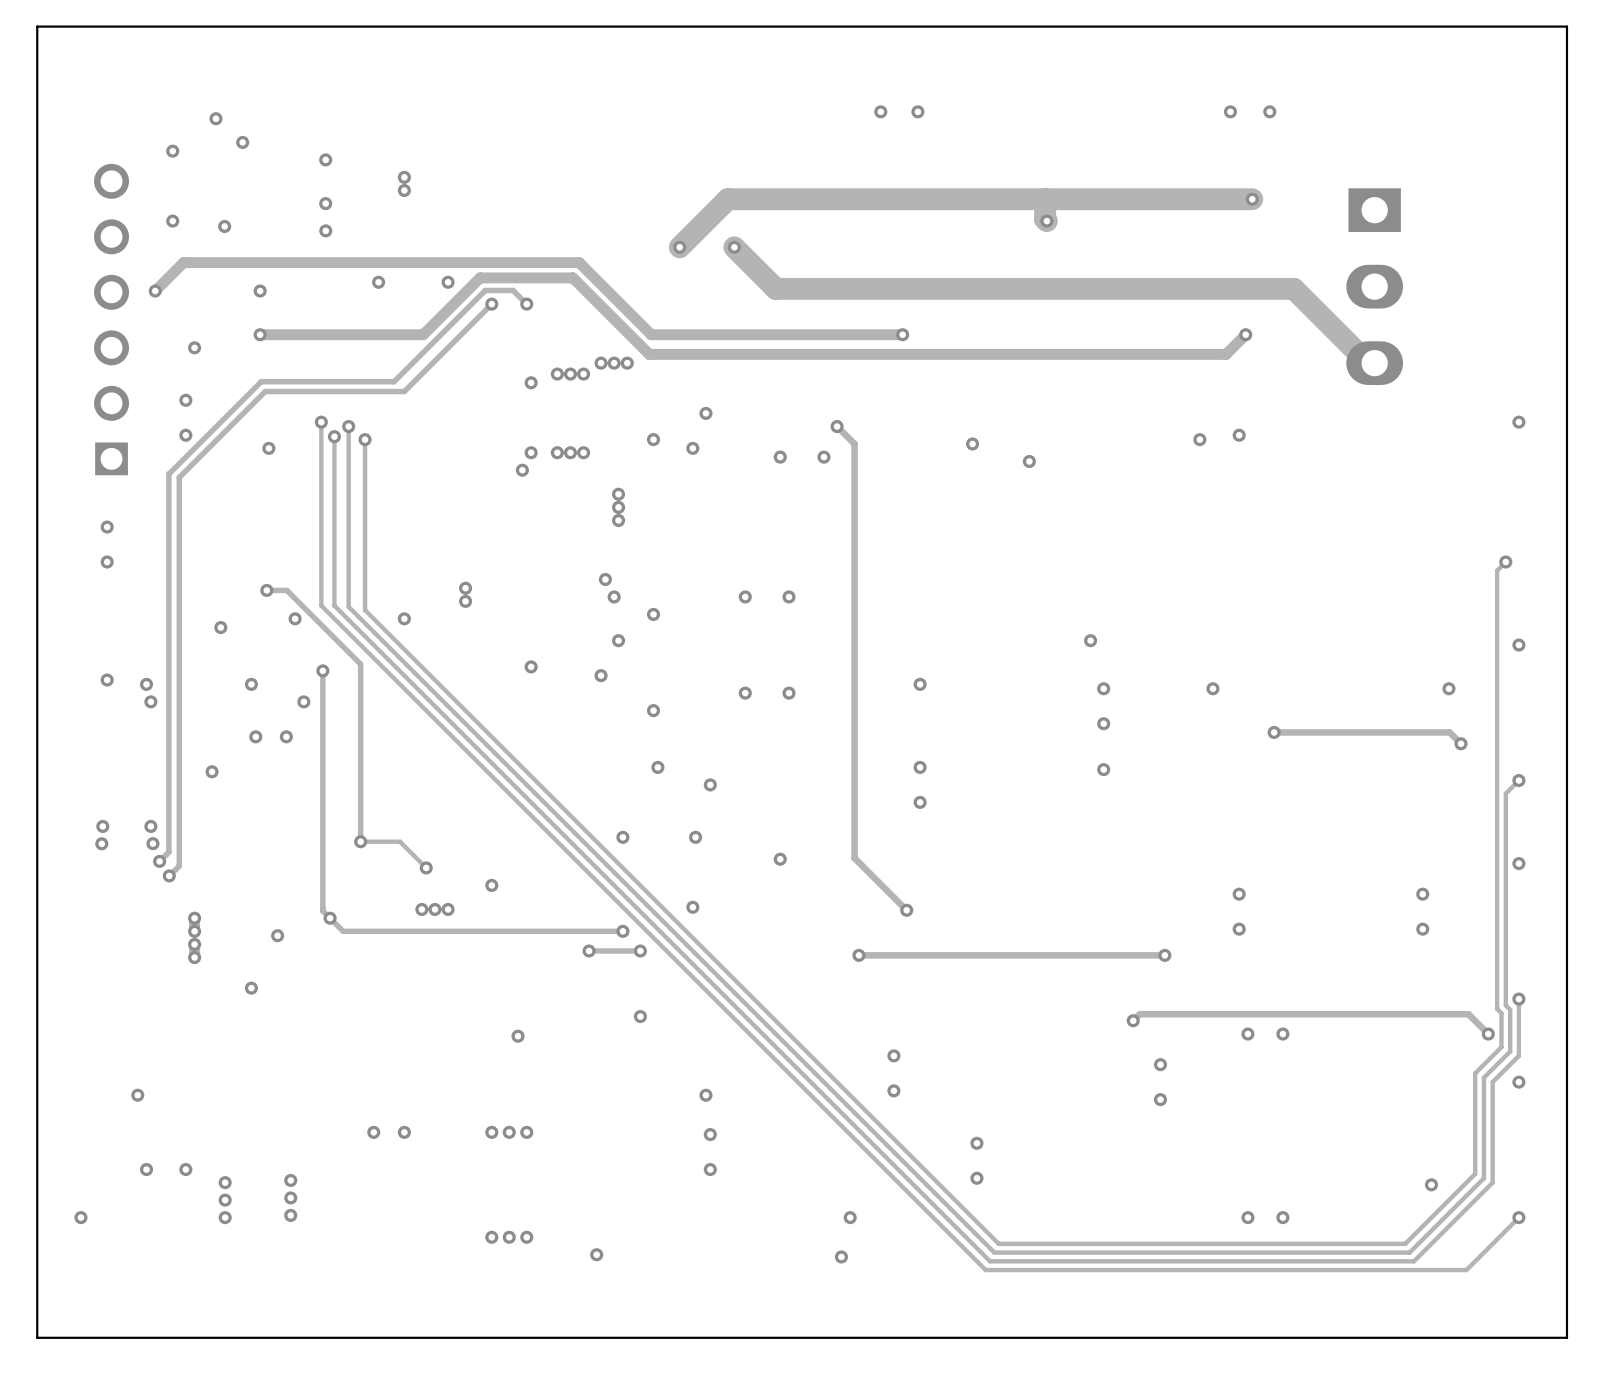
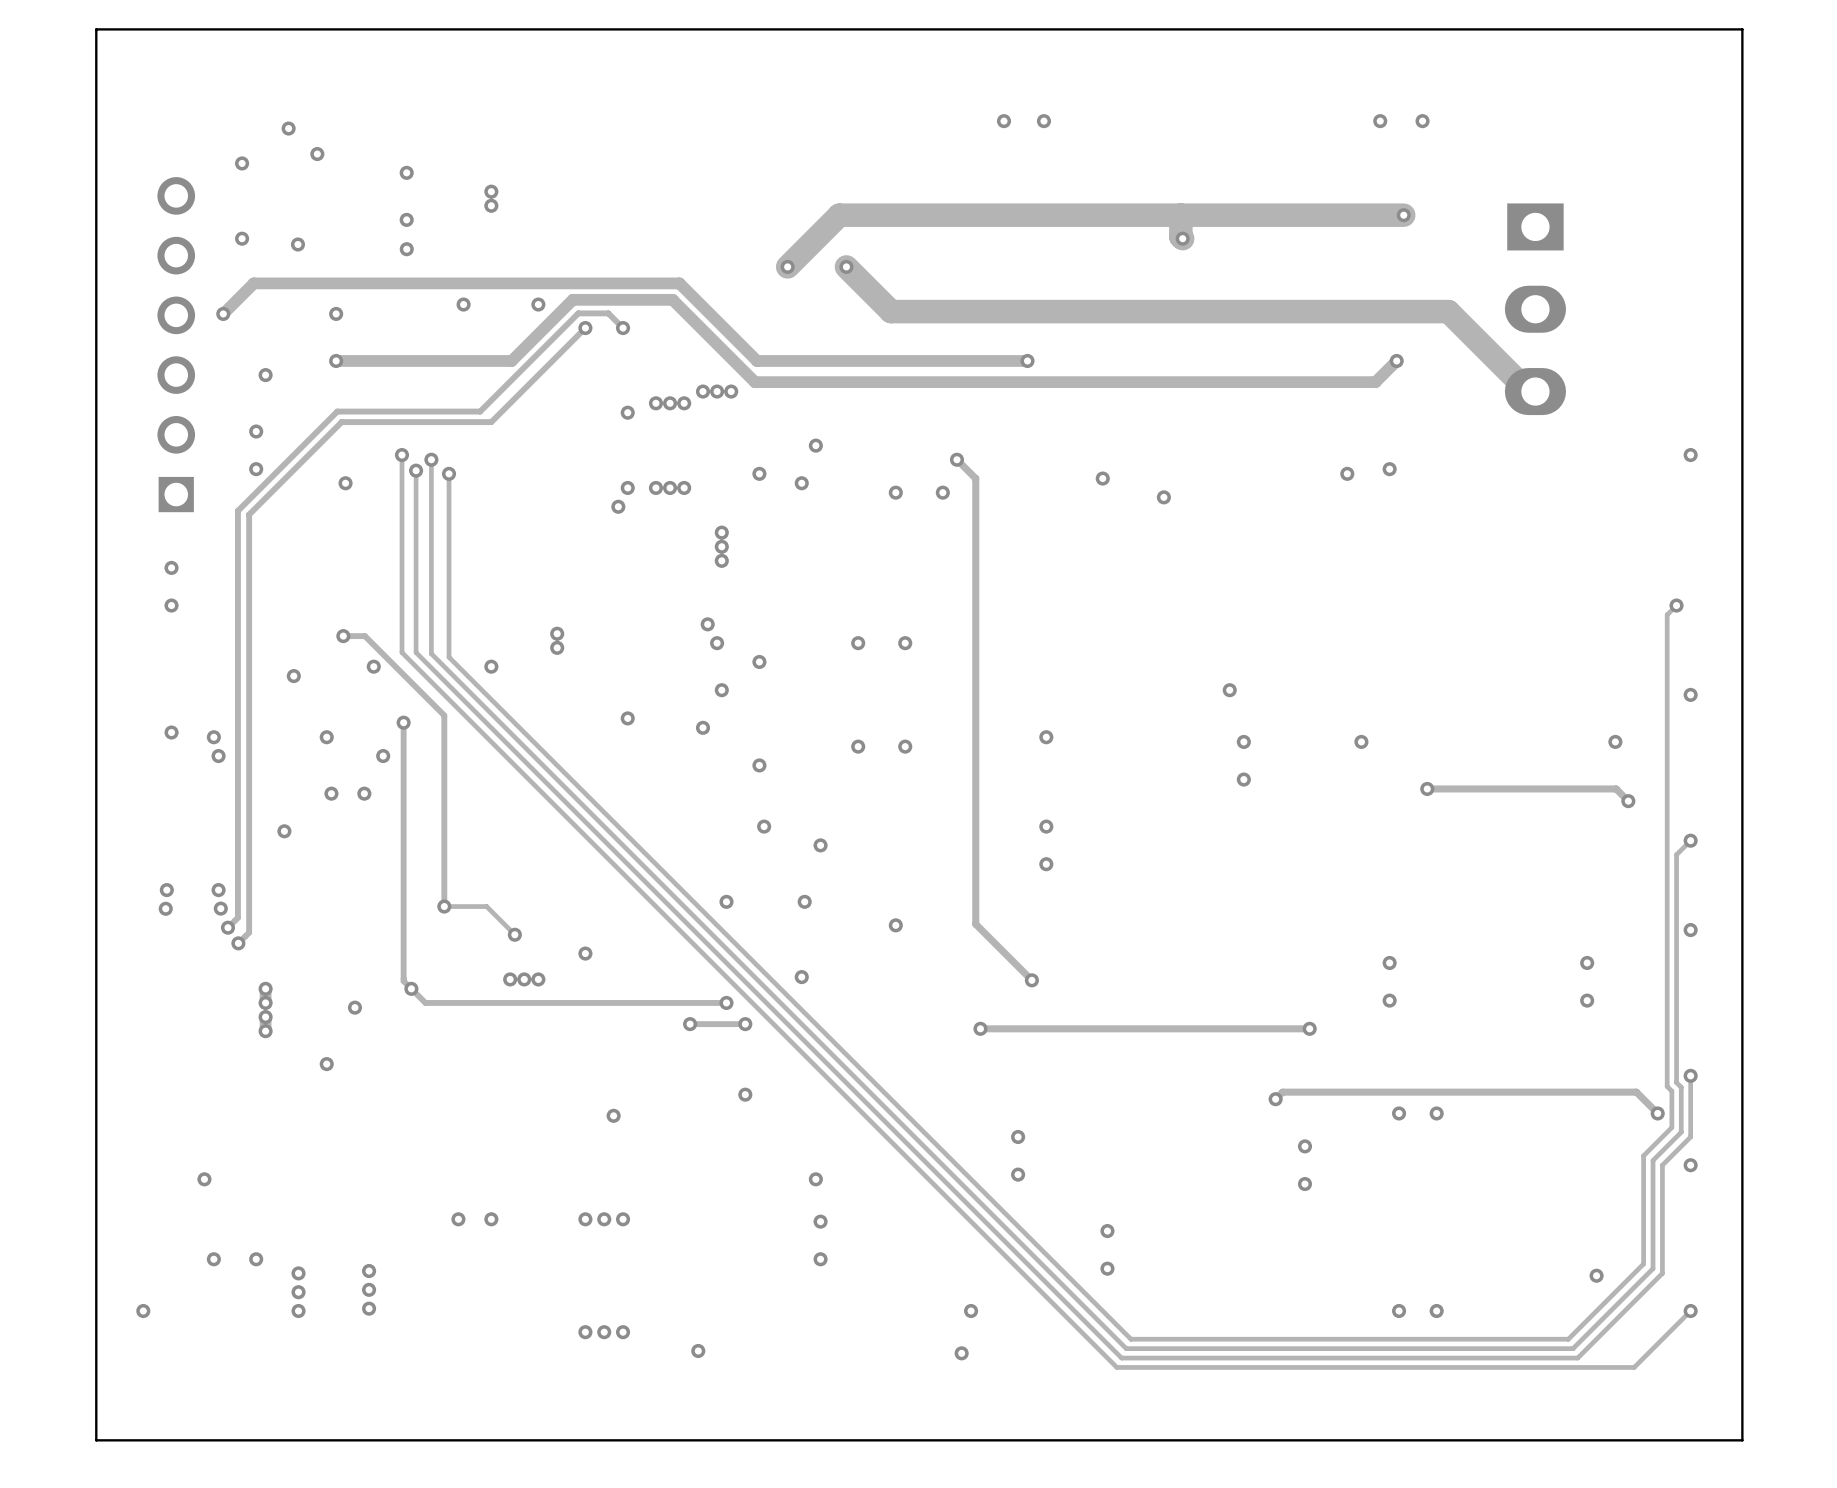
via: (1103, 769) -> none

